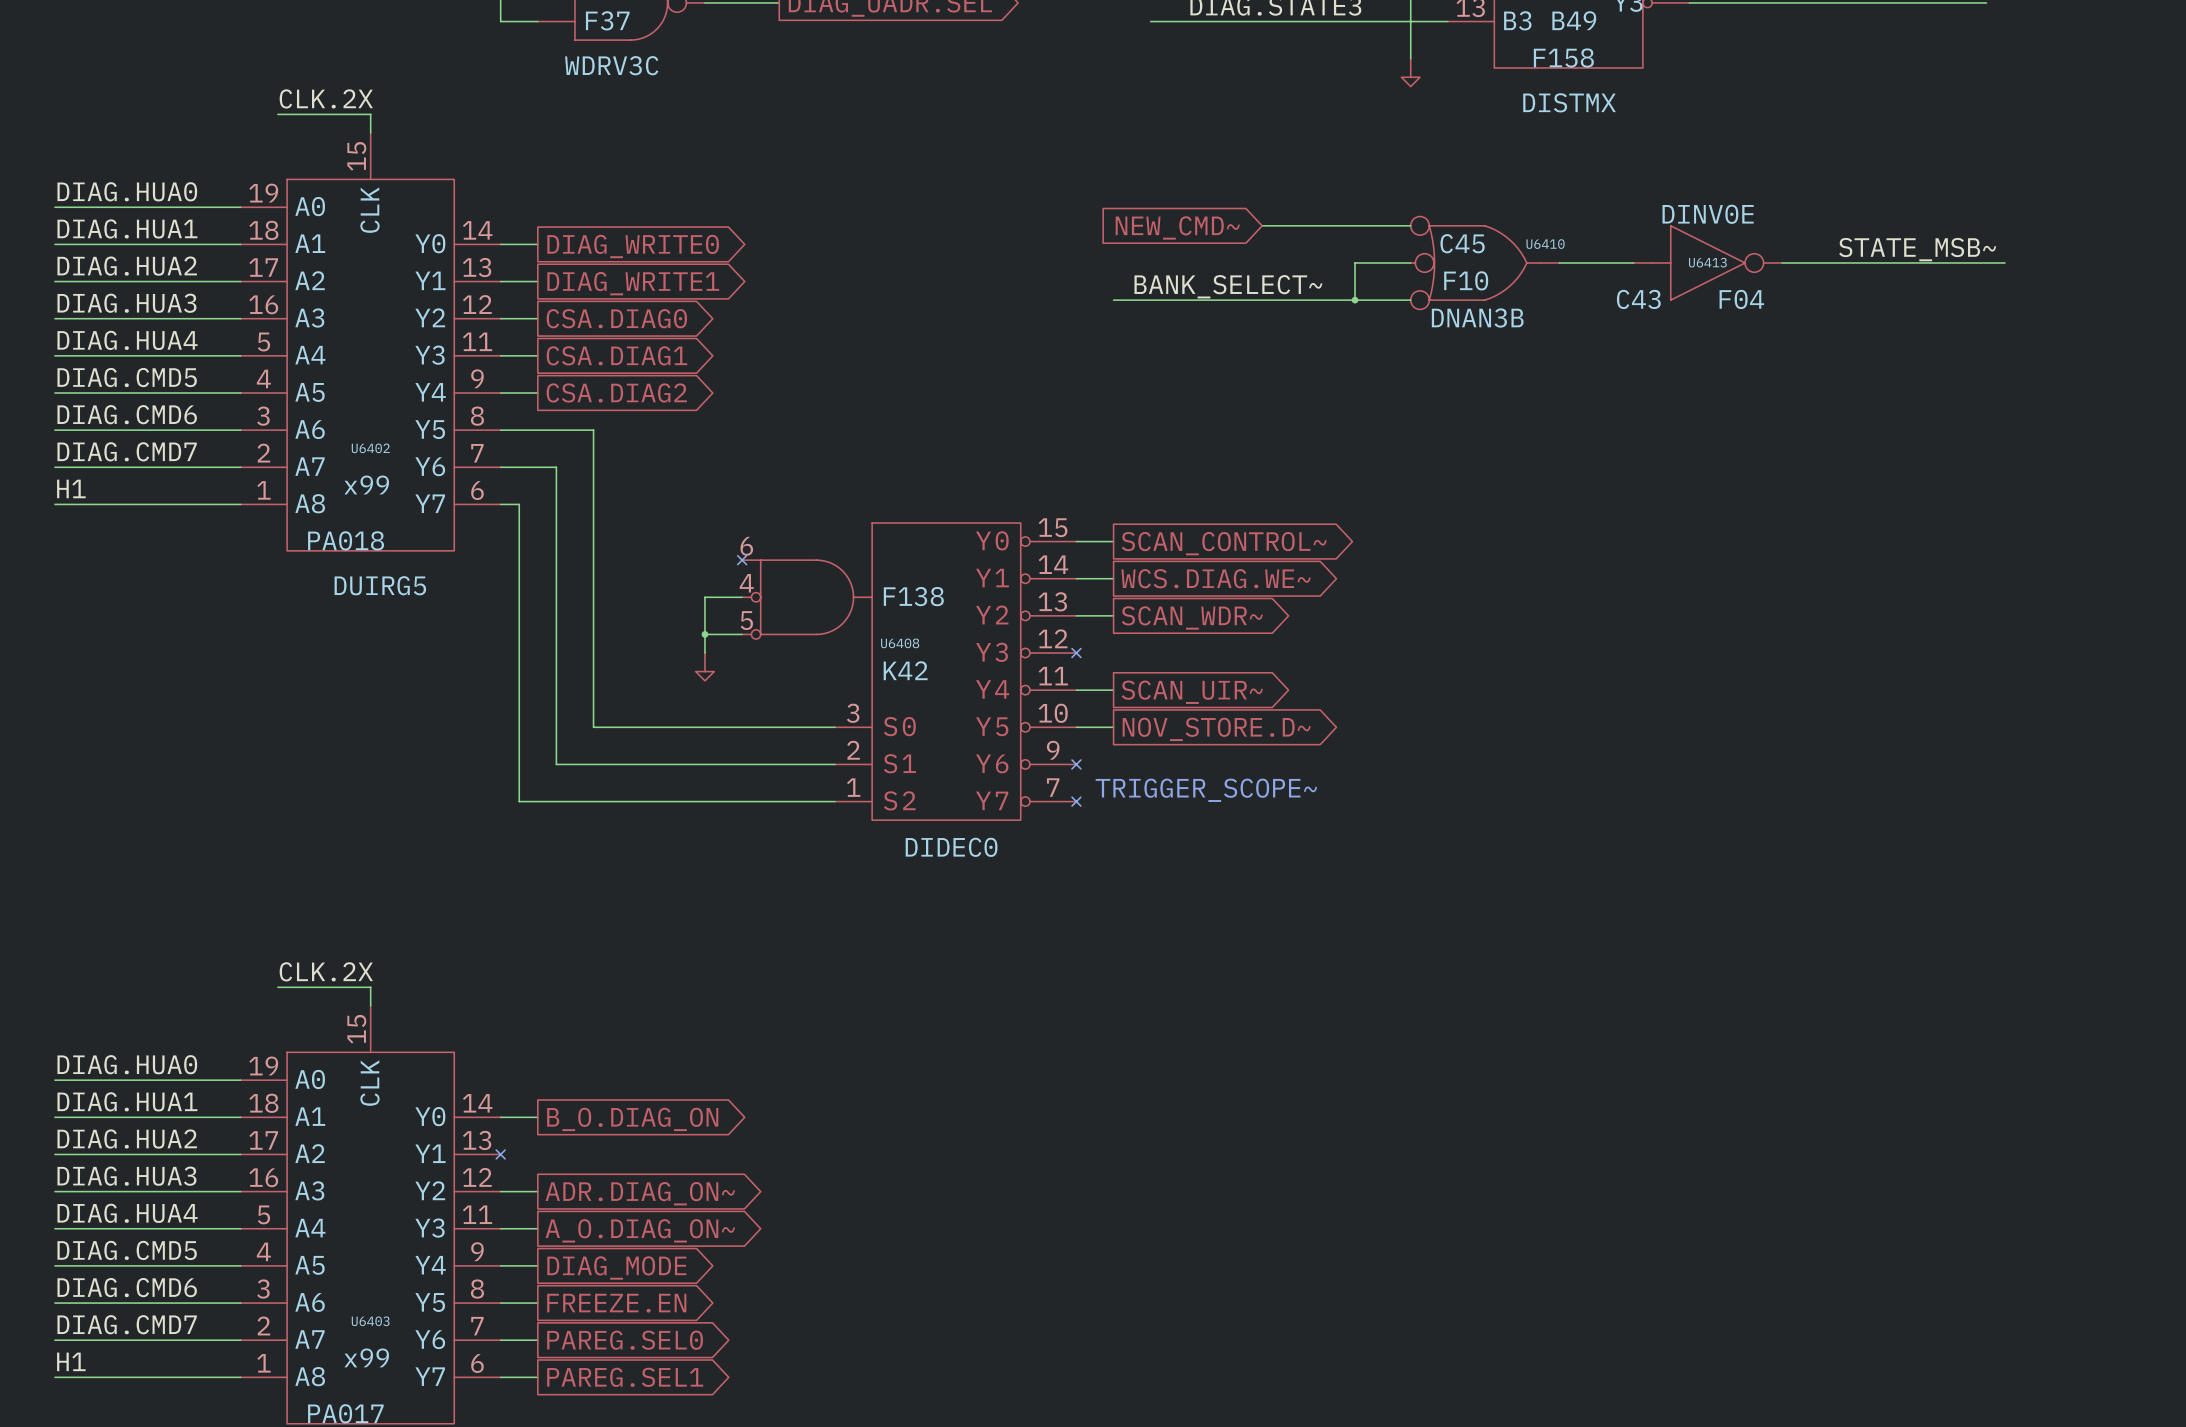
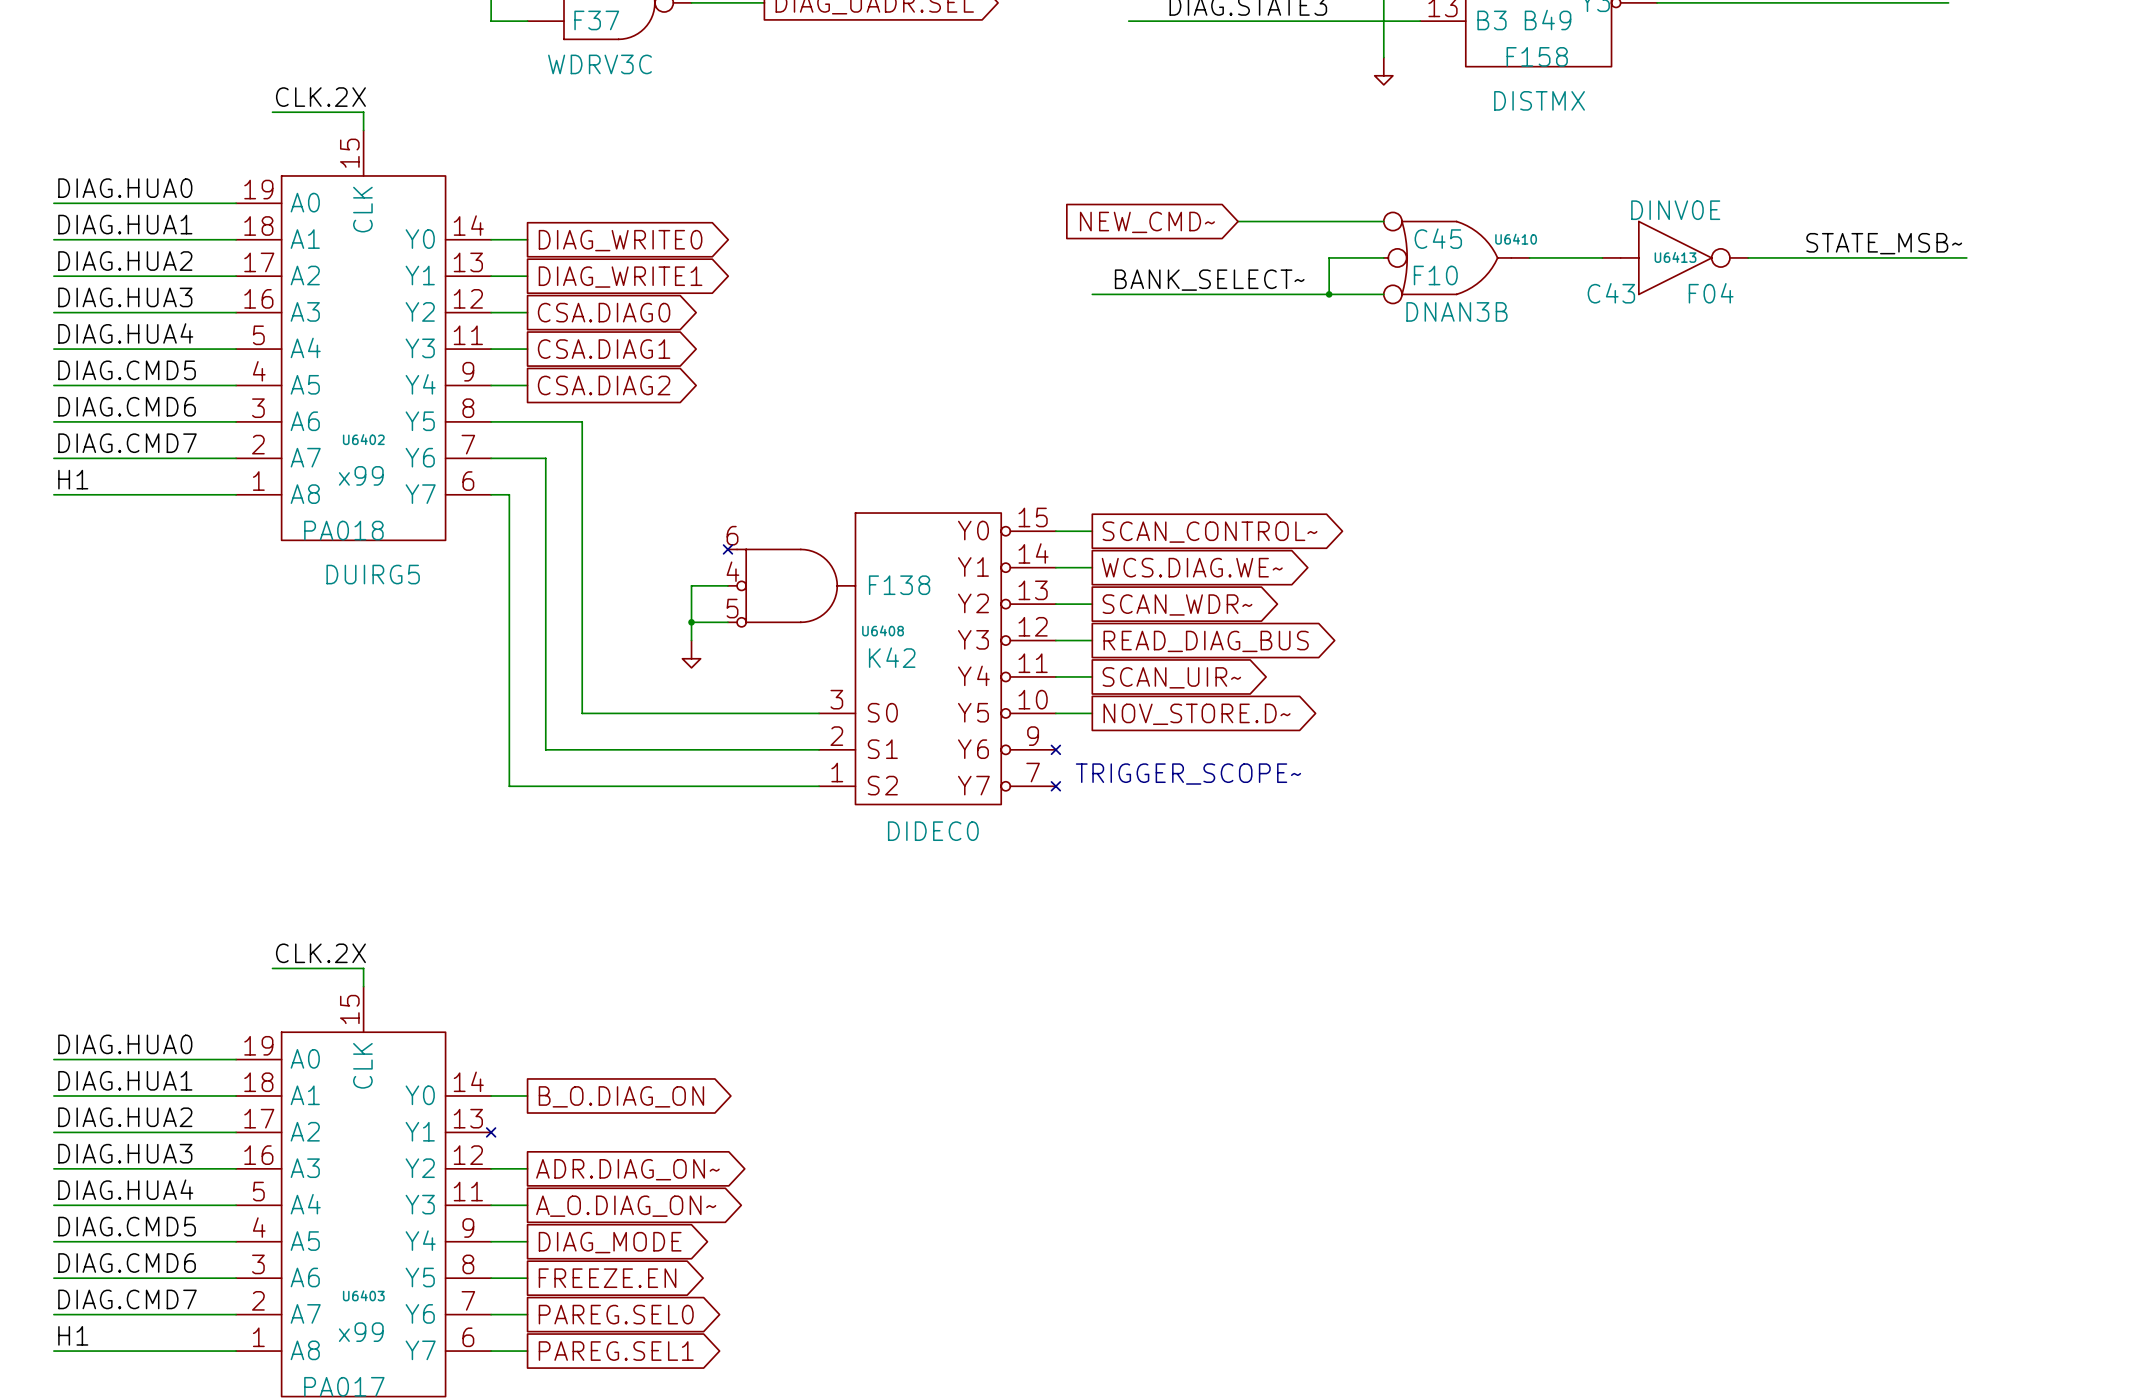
wire: none -> (1055, 640) (1092, 640)
no-connect mark: (1076, 653) -> none
global label: none -> READ_DIAG_BUS (1206, 641)

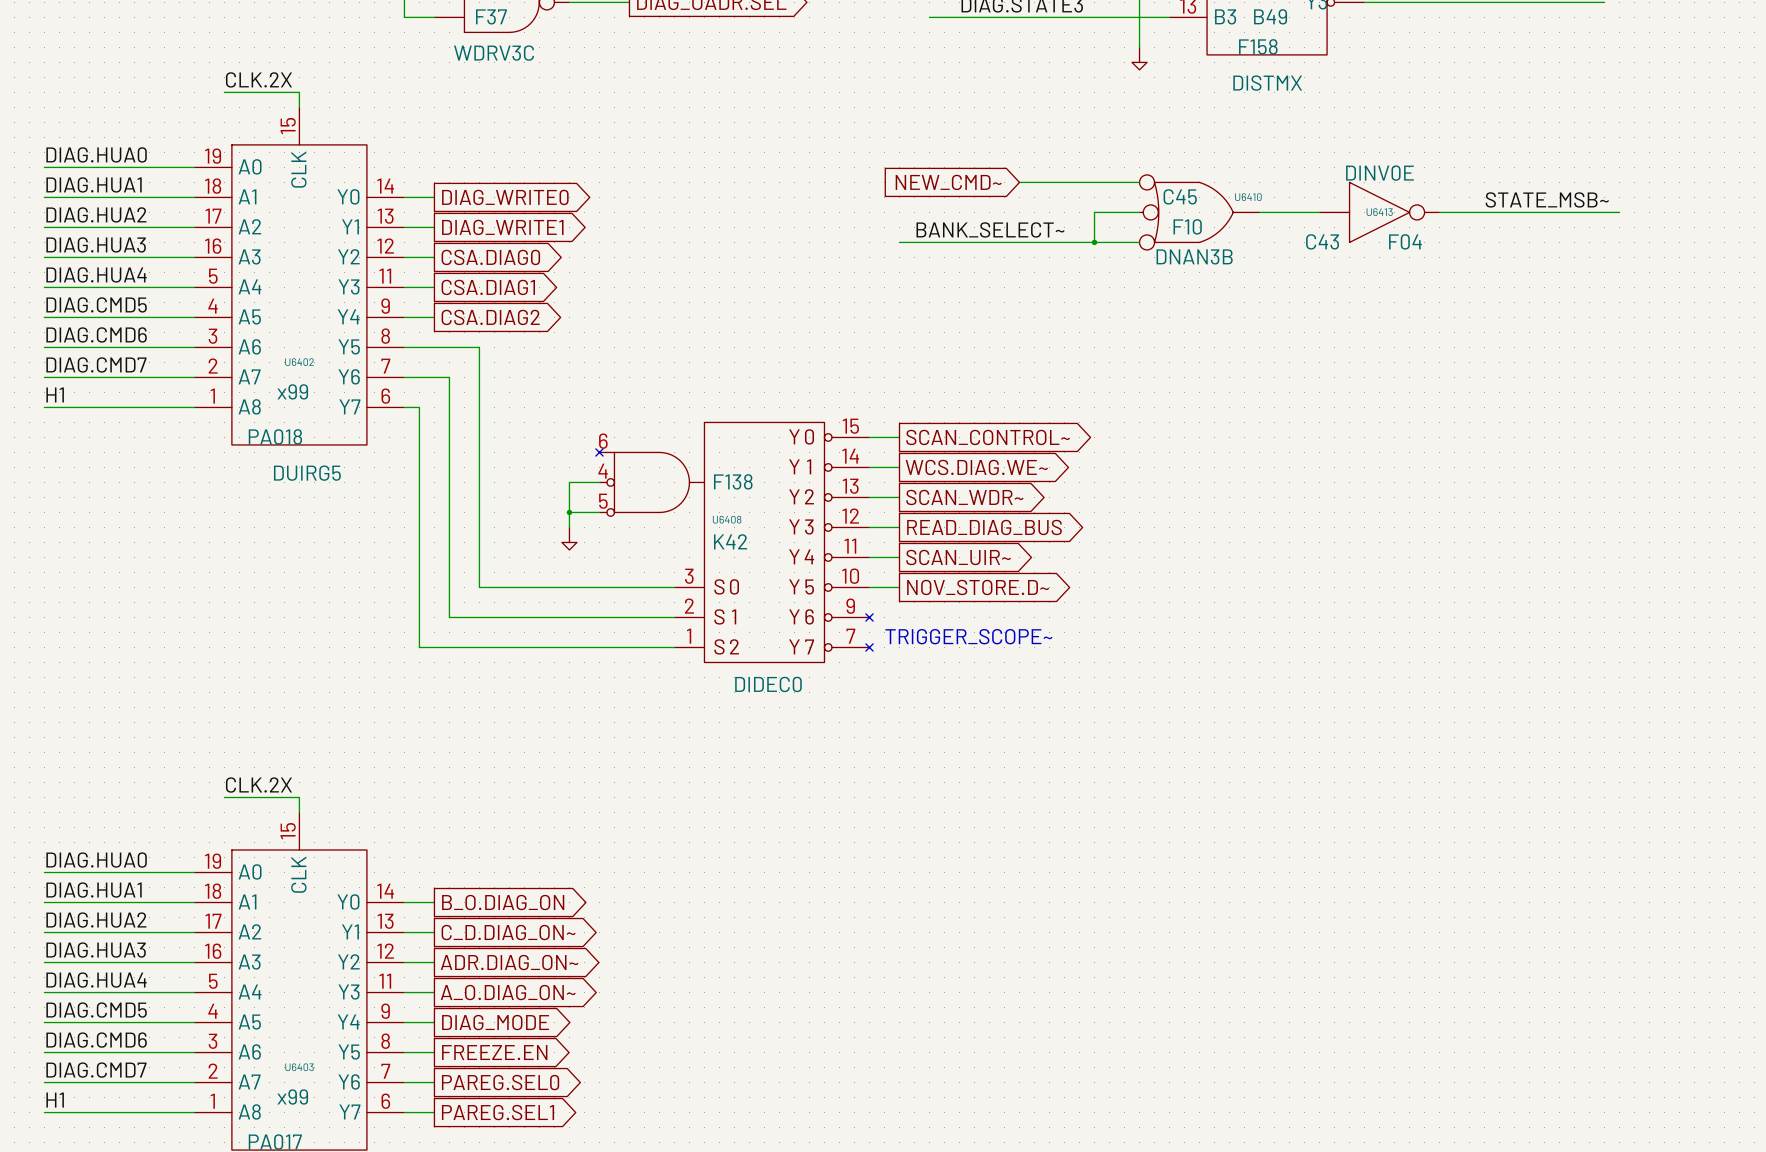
wire: none -> (404, 932) (434, 932)
no-connect mark: (491, 1132) -> none
global label: none -> C_D.DIAG_ON~ (508, 932)

